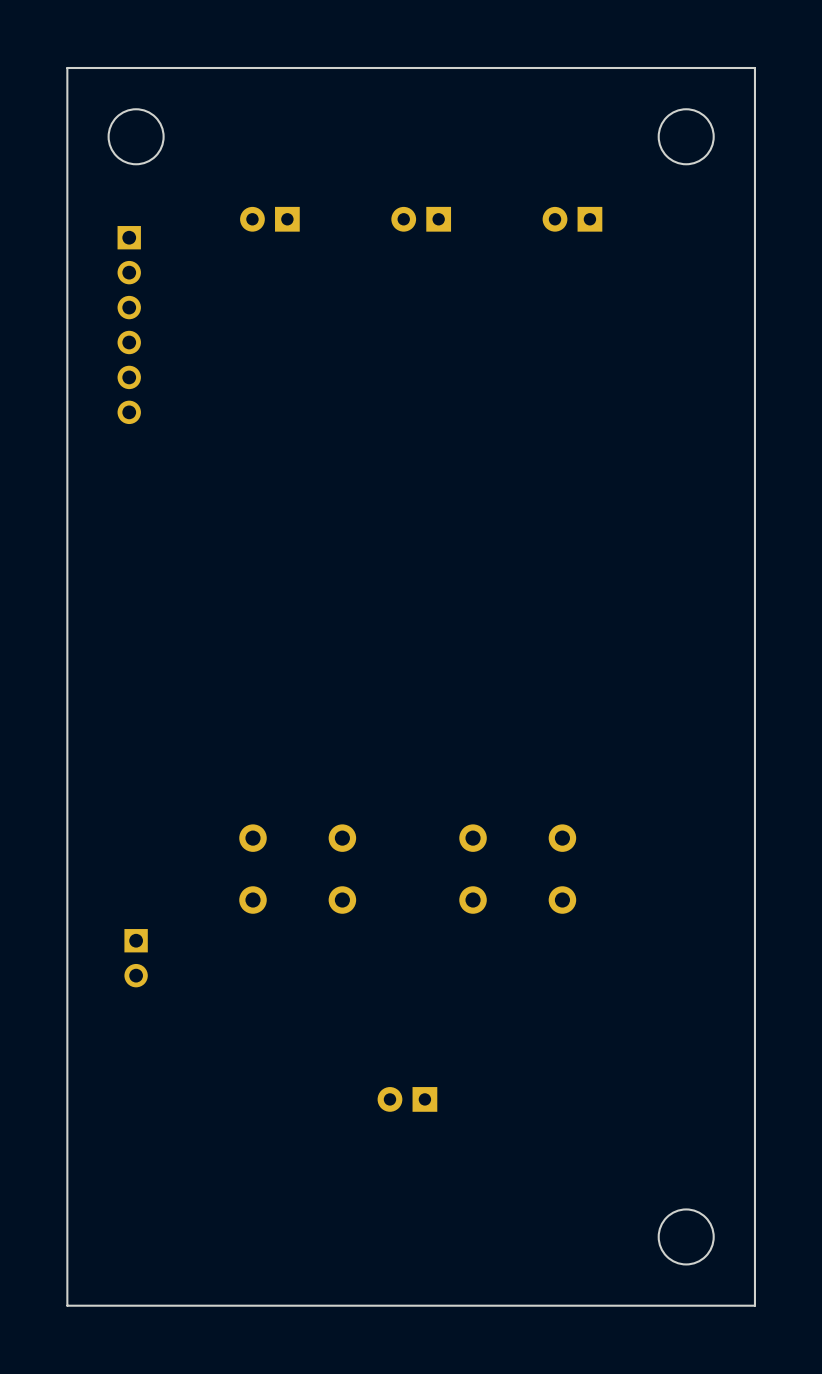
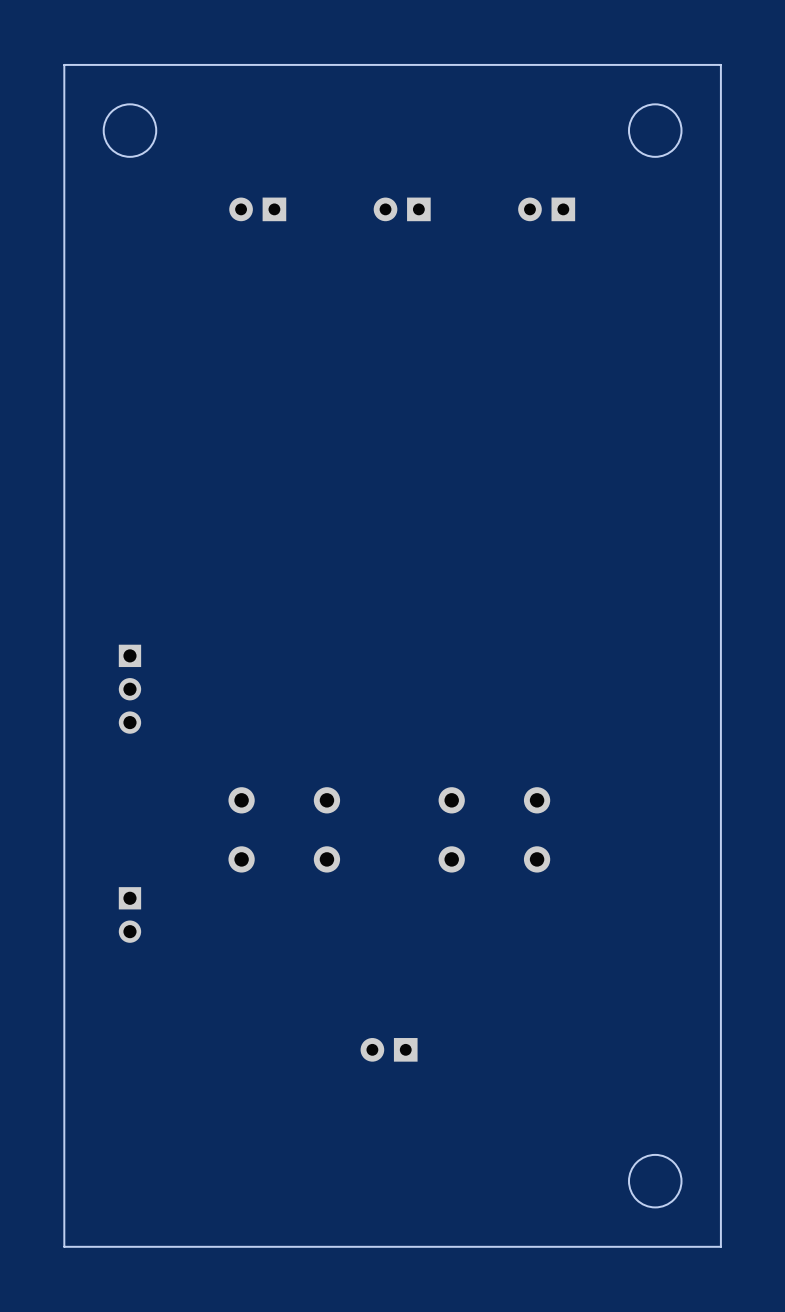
part: (129, 325) -> none
part: none -> (129, 689)

